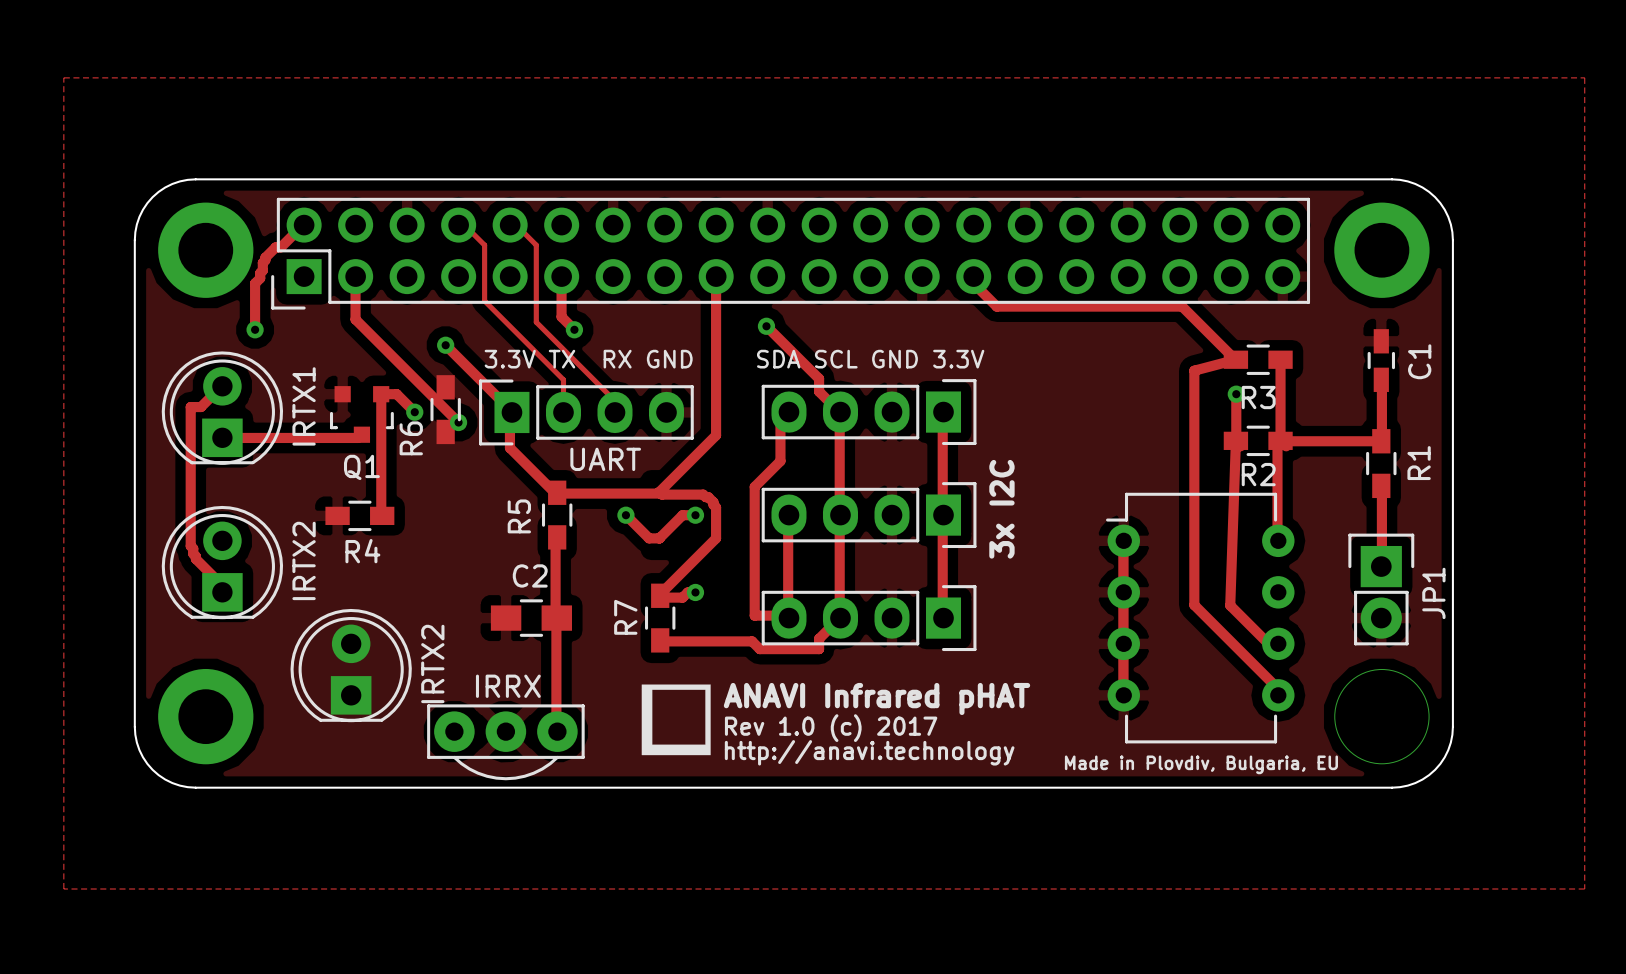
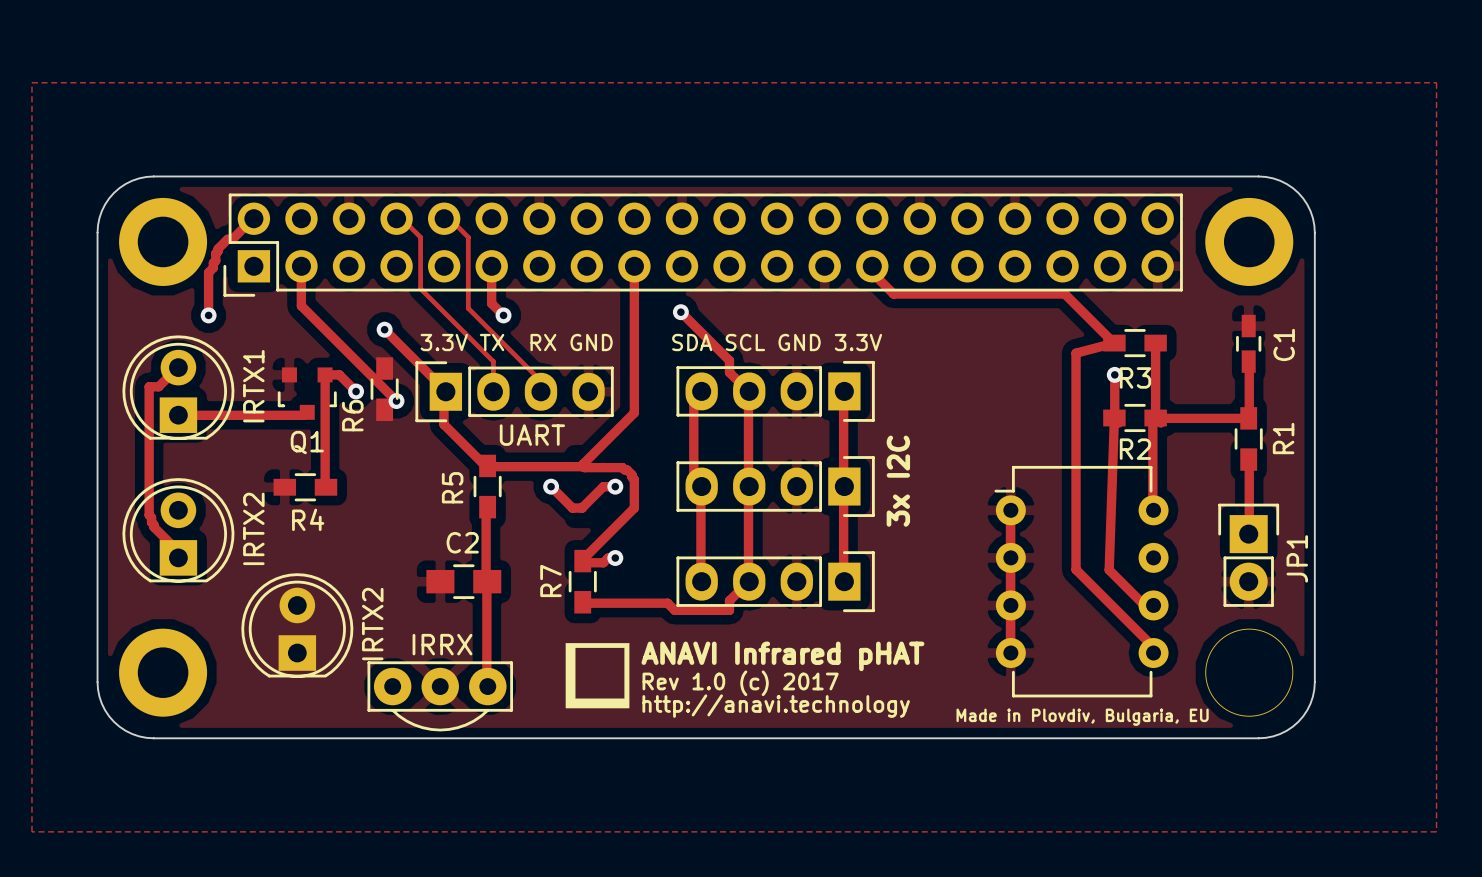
track: (780, 461) (754, 486) (754, 615) (780, 615) -> (693, 436) (693, 484)

